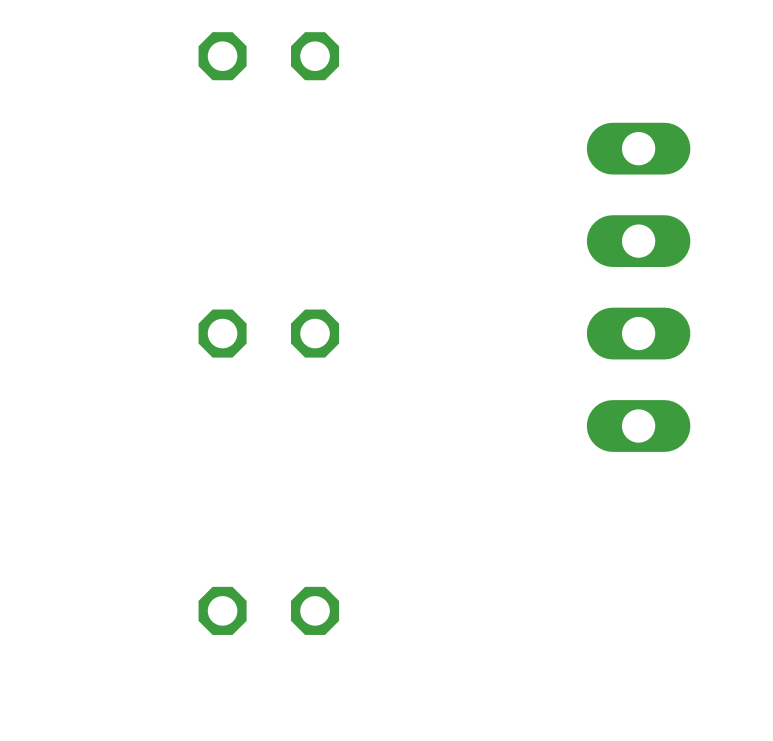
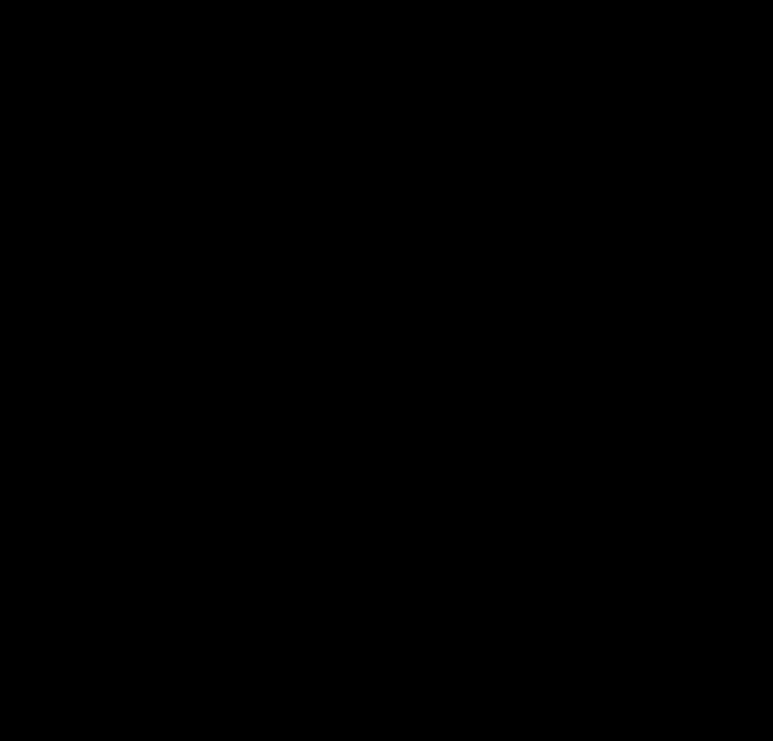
part: (268, 56) -> none
part: (638, 287) -> none
part: (268, 333) -> none
part: (268, 610) -> none

